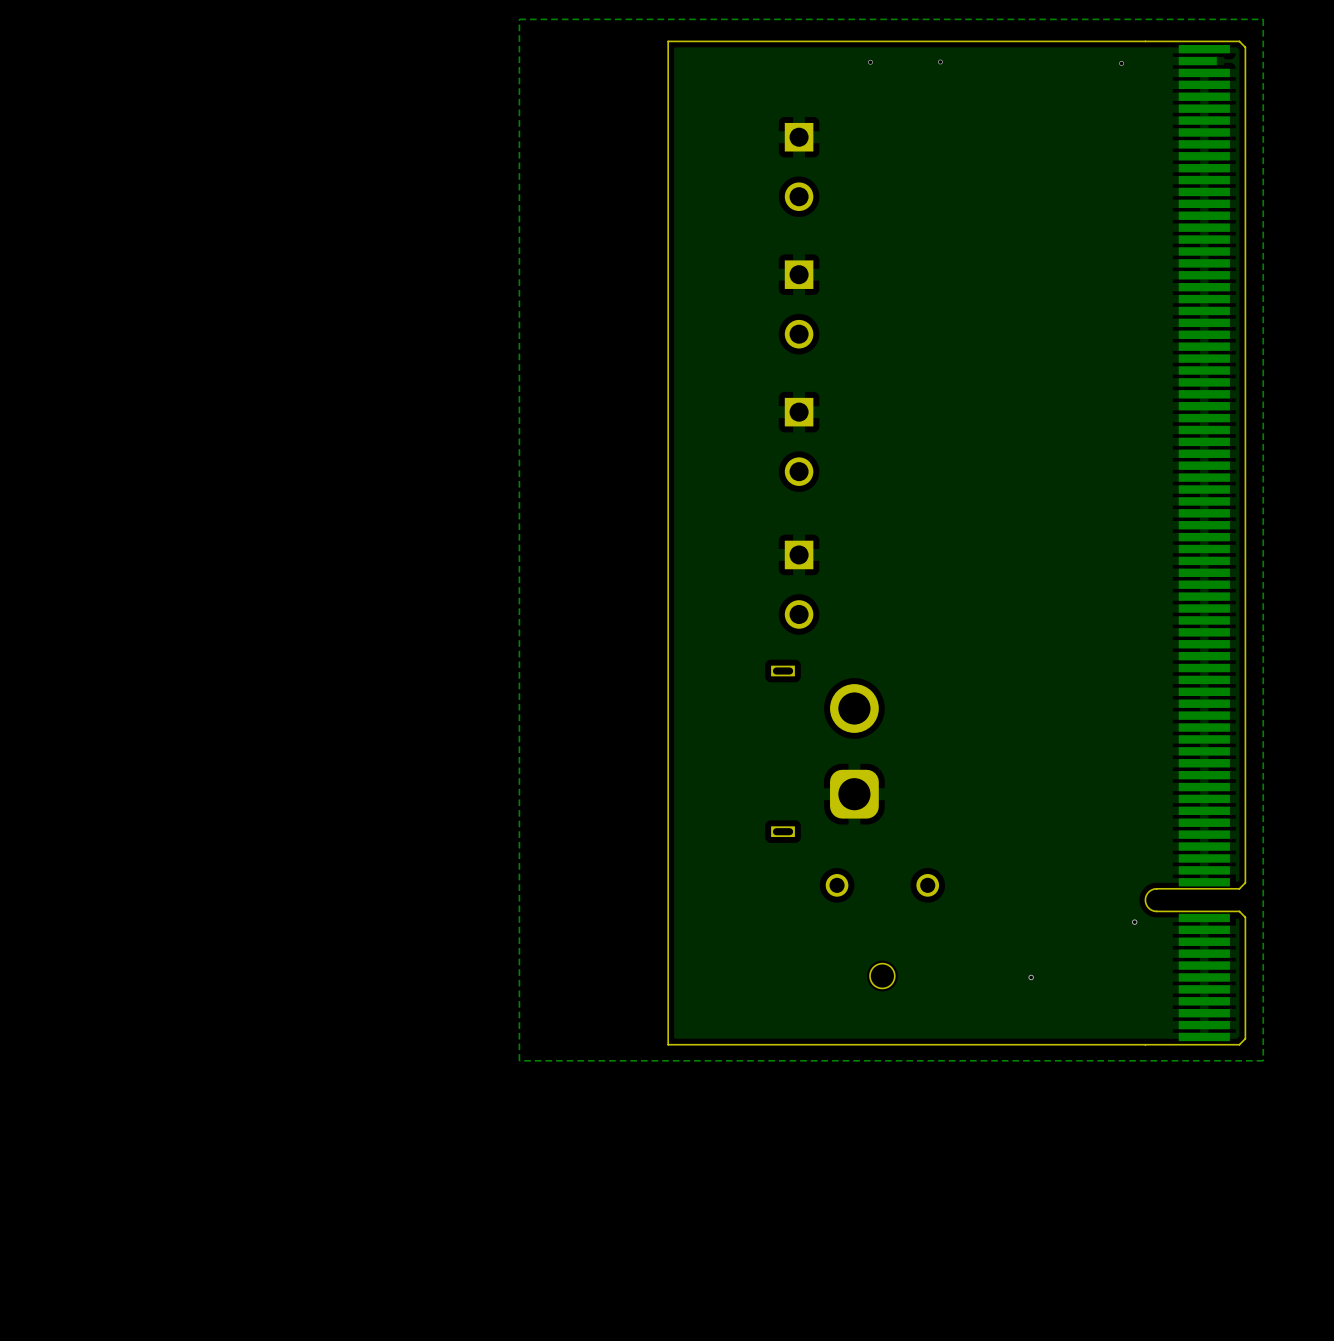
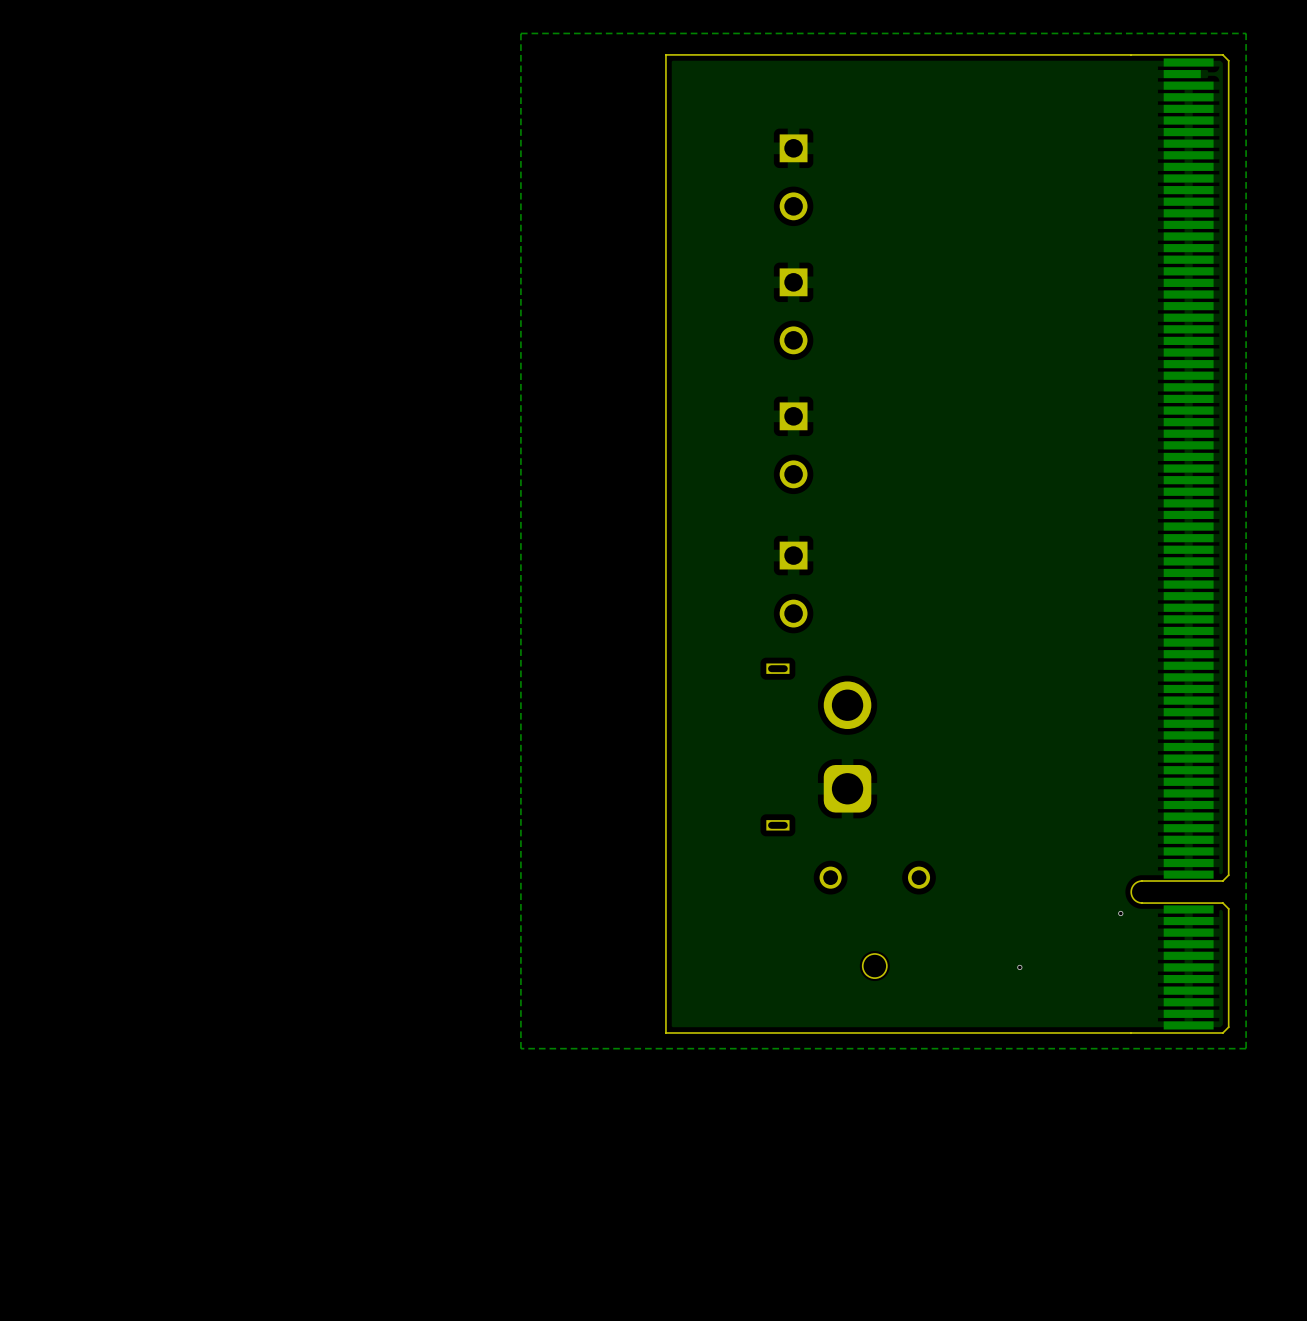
via: (870, 62) -> none
via: (940, 62) -> none
via: (1121, 63) -> none

